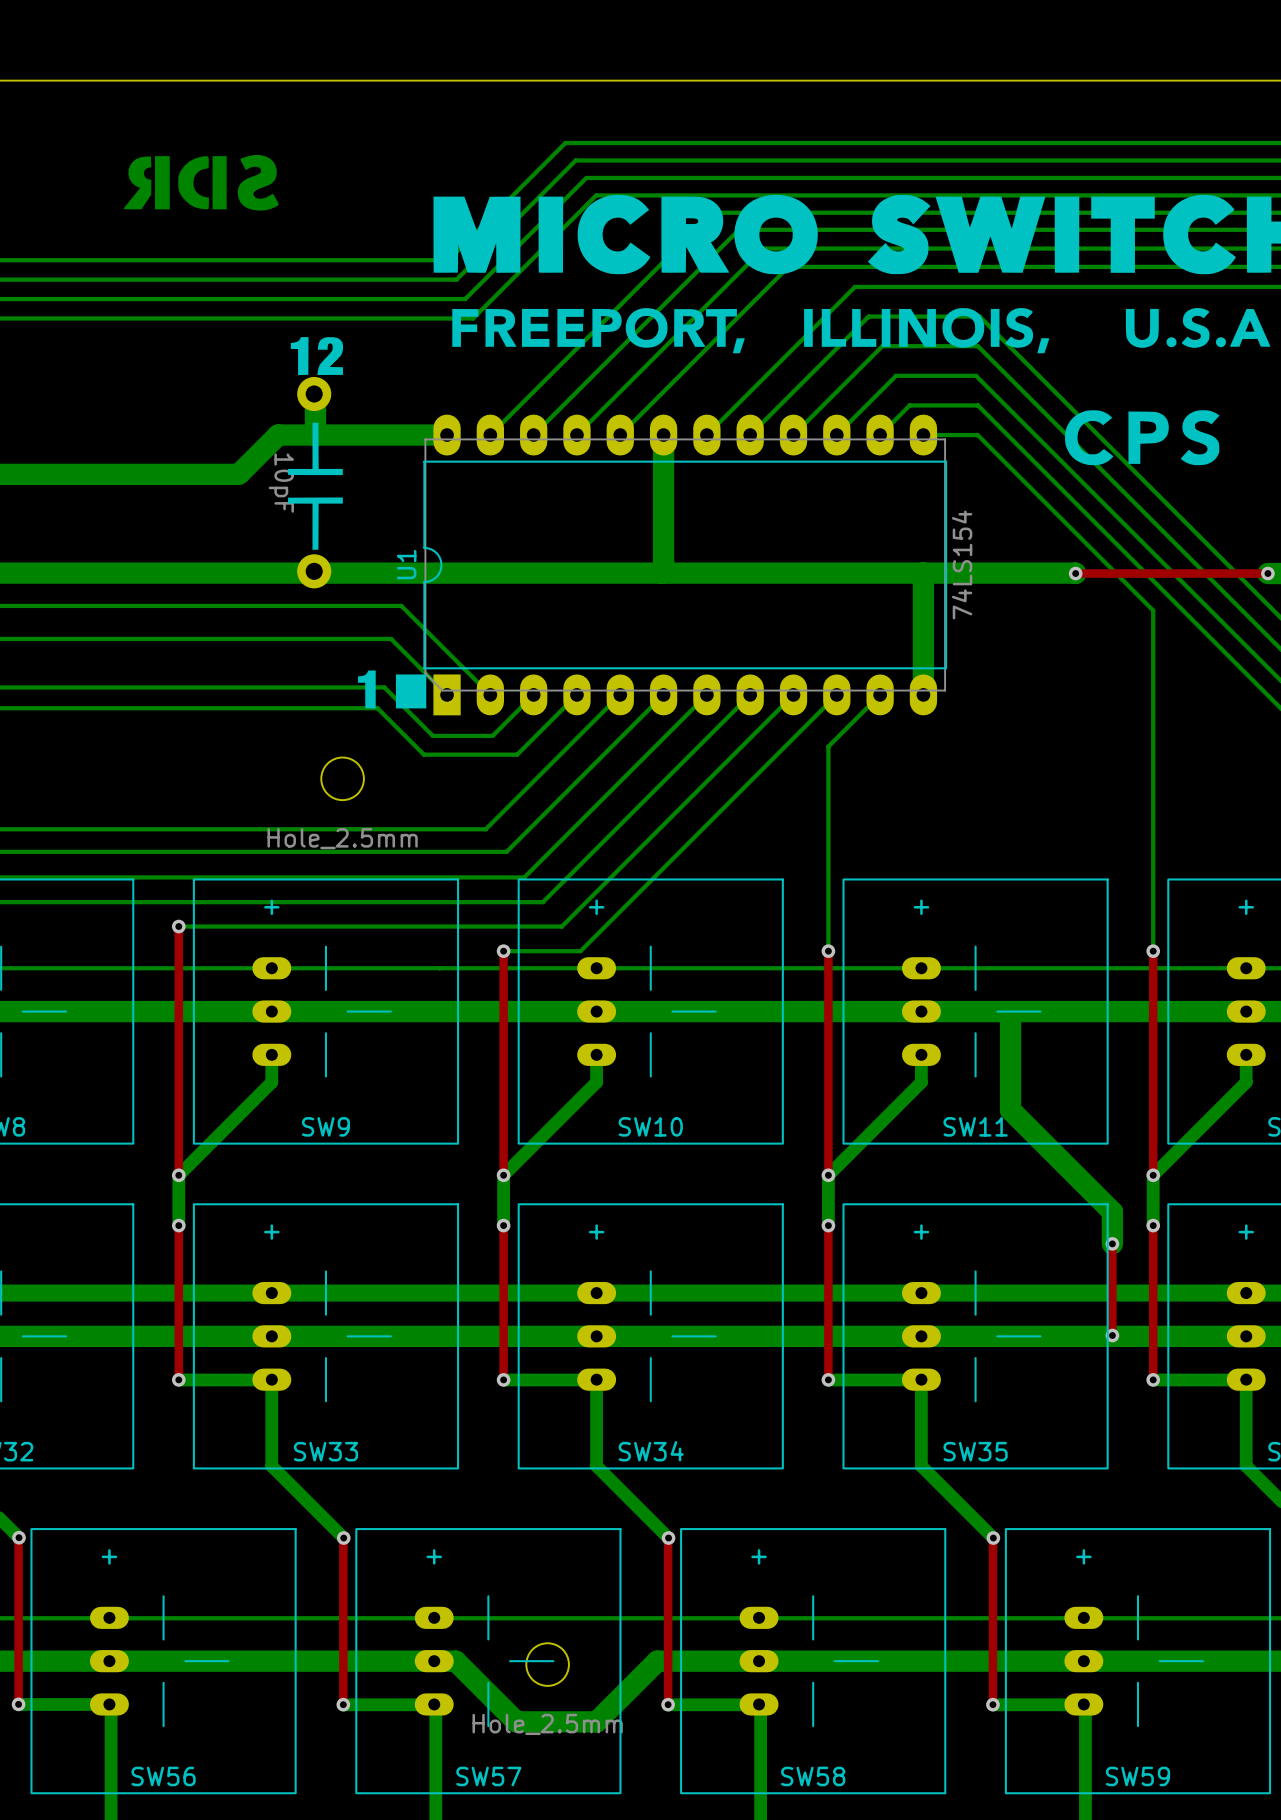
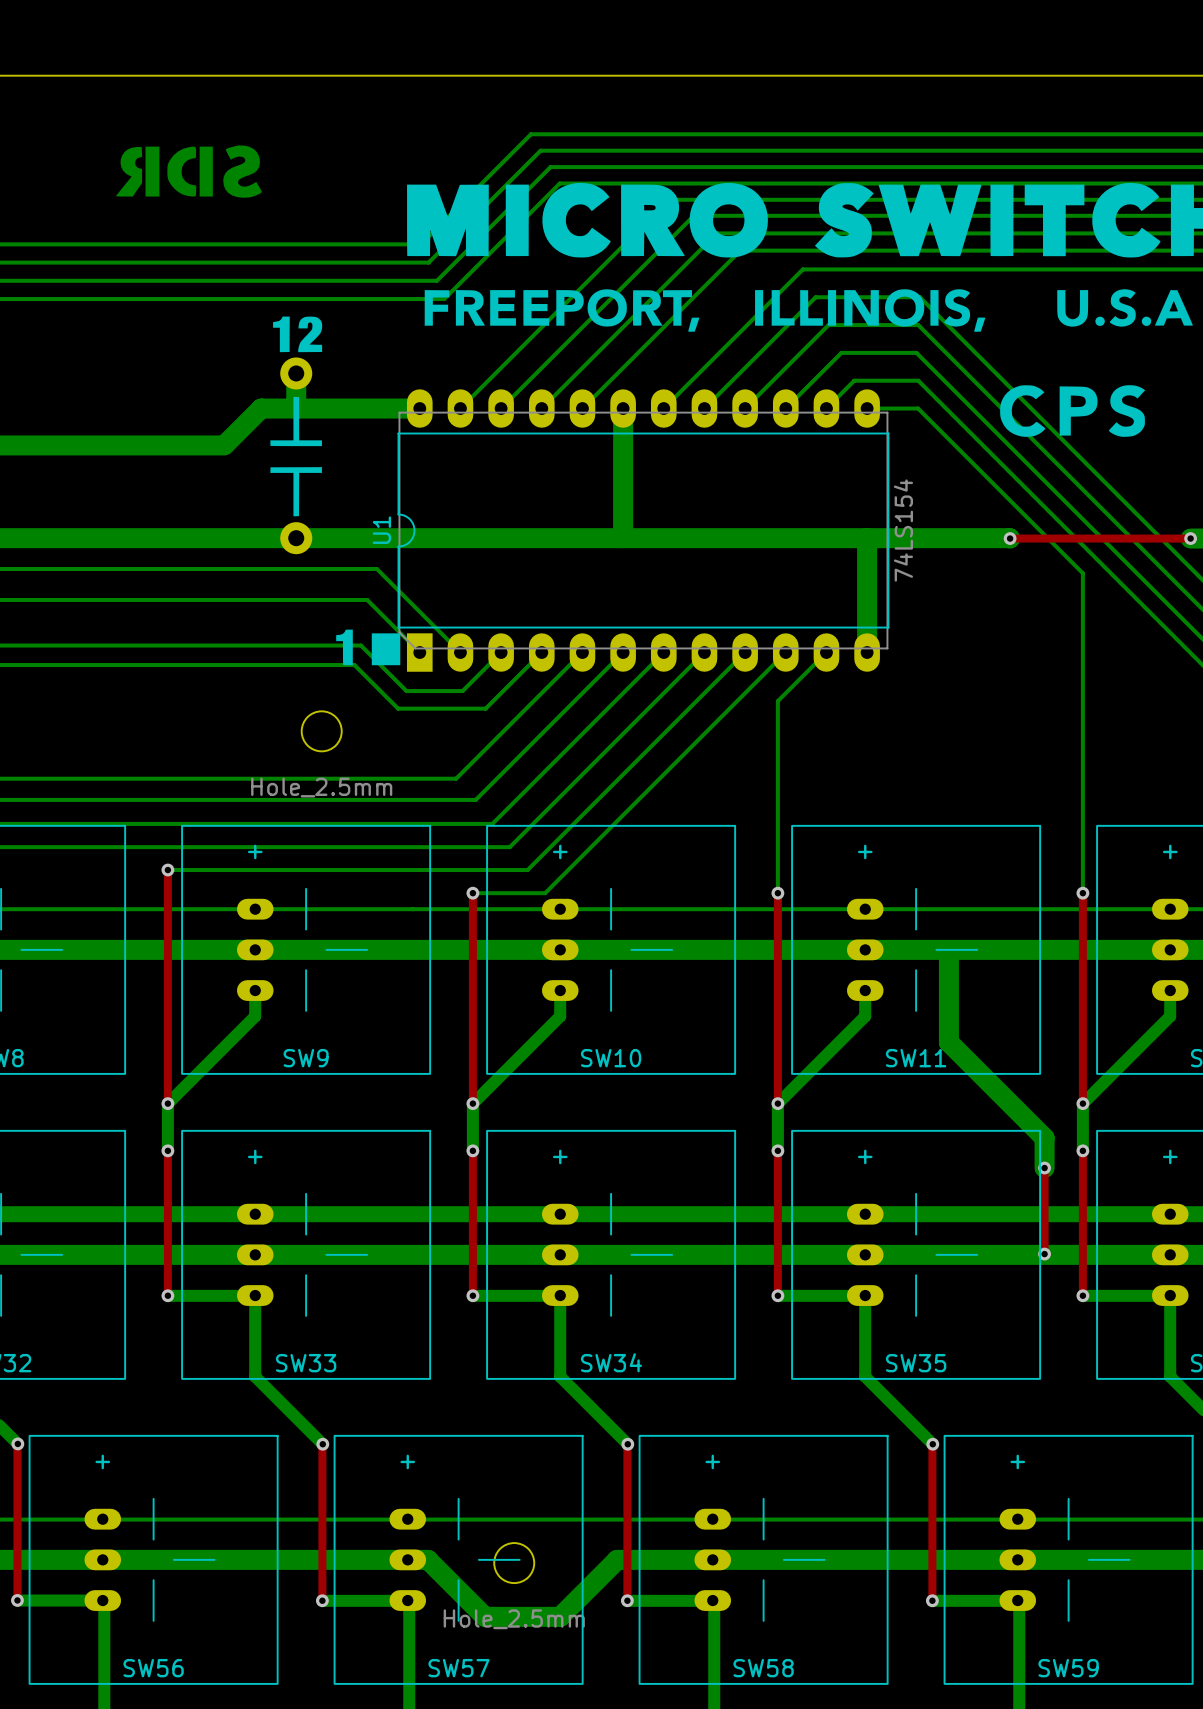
part: none -> (296, 373)
part: 10pF (314, 482) -> none
part: none -> (296, 538)

